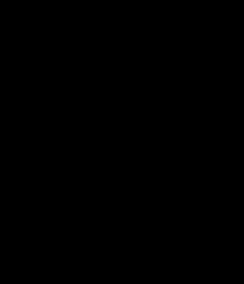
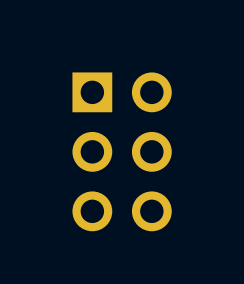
part: none -> (122, 151)

